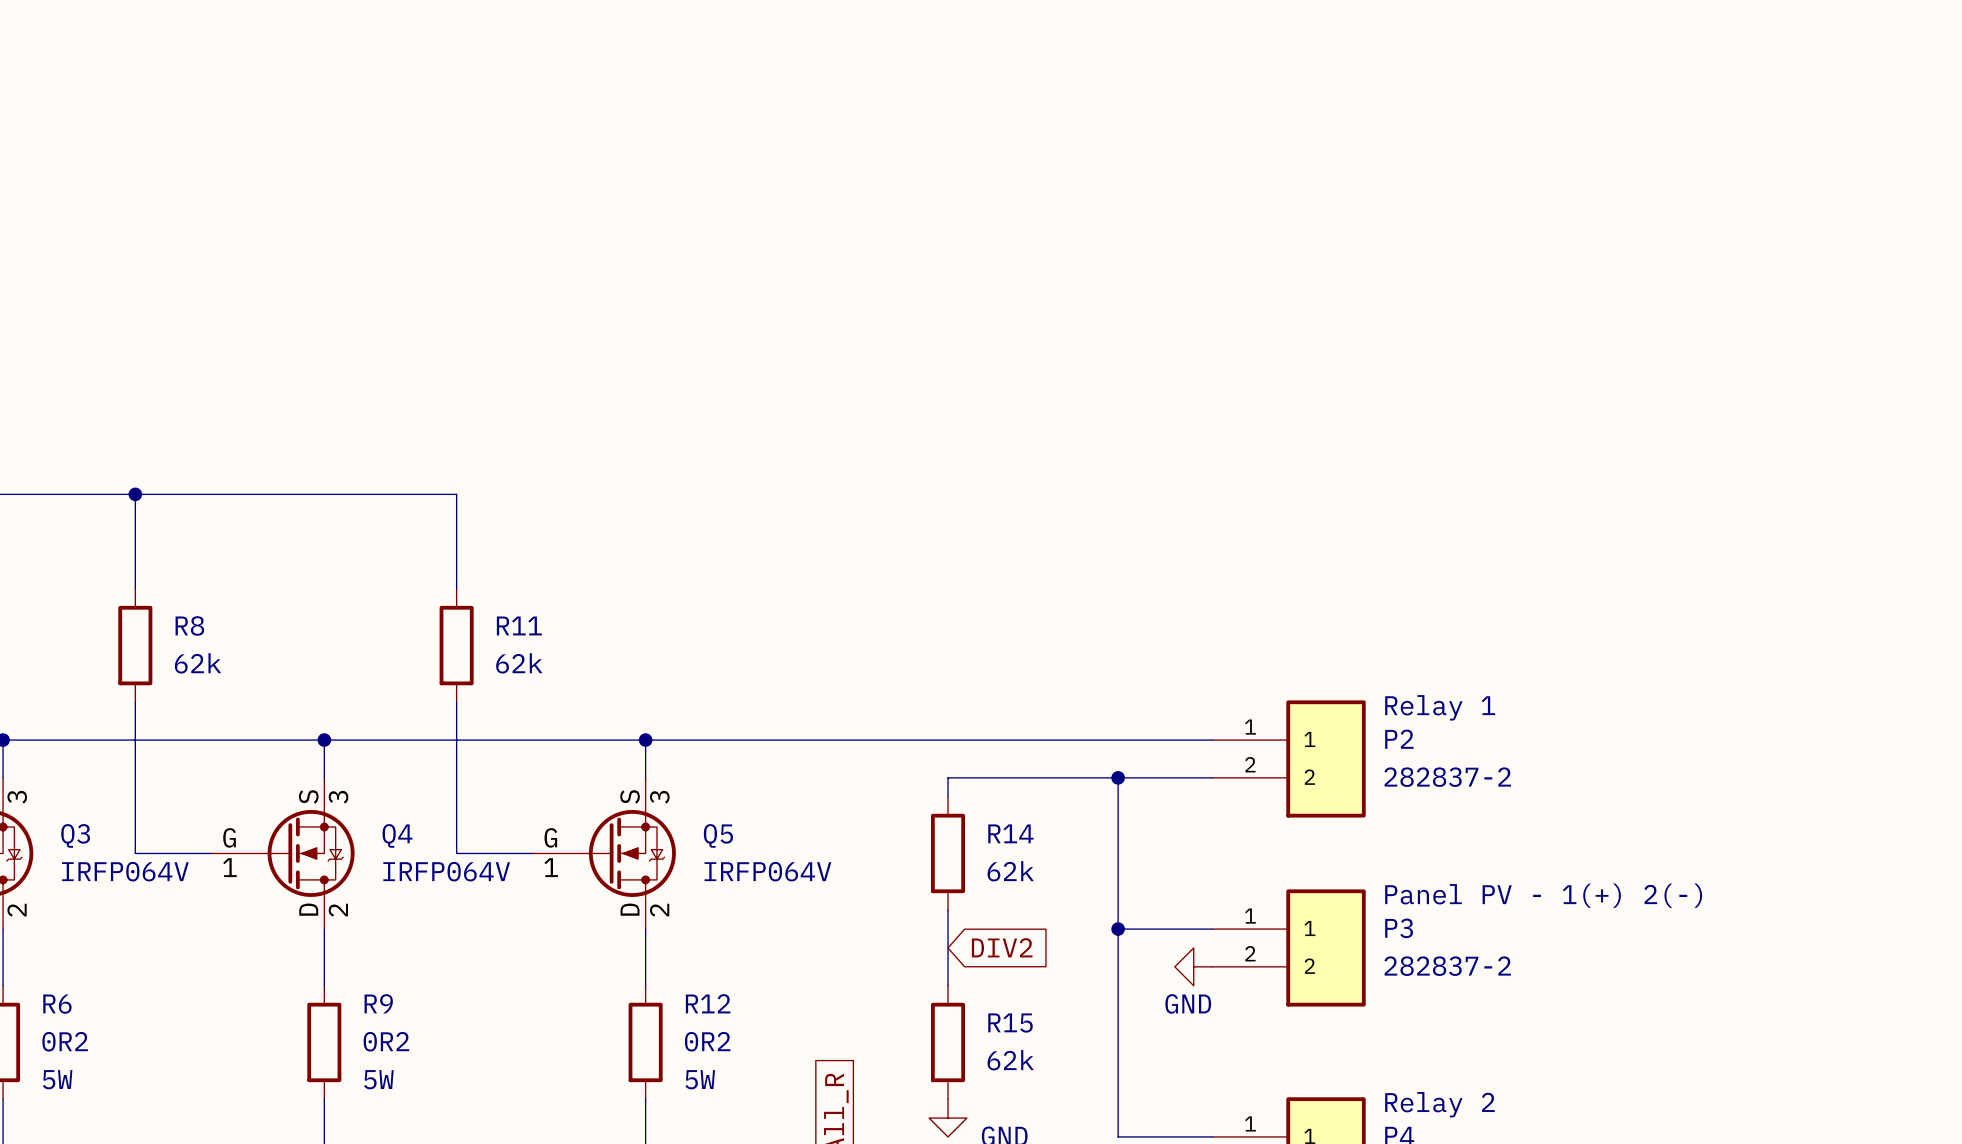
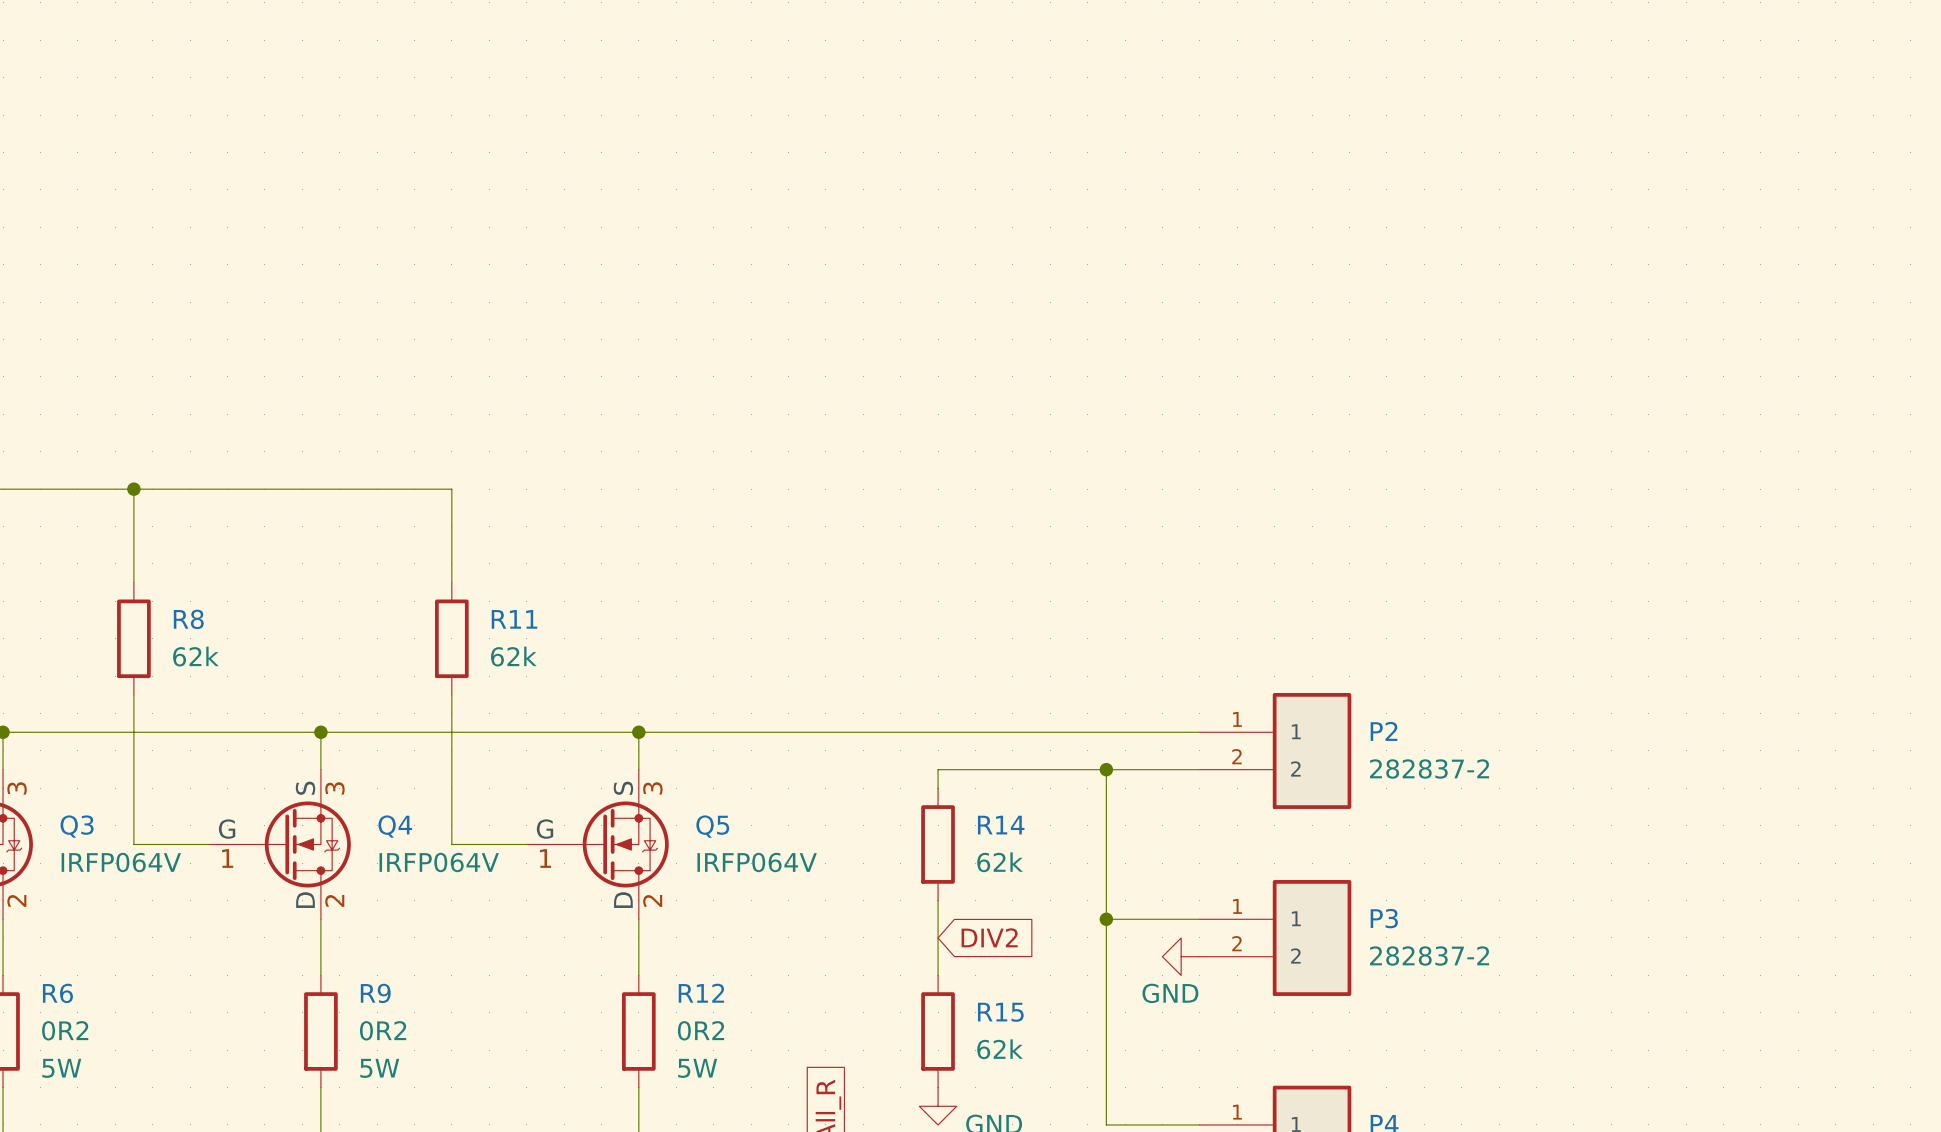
text: Relay 1 (1440, 707) -> none
text: Panel PV - 1(+) 2(-) (1543, 895) -> none
text: Relay 2 (1439, 1104) -> none

